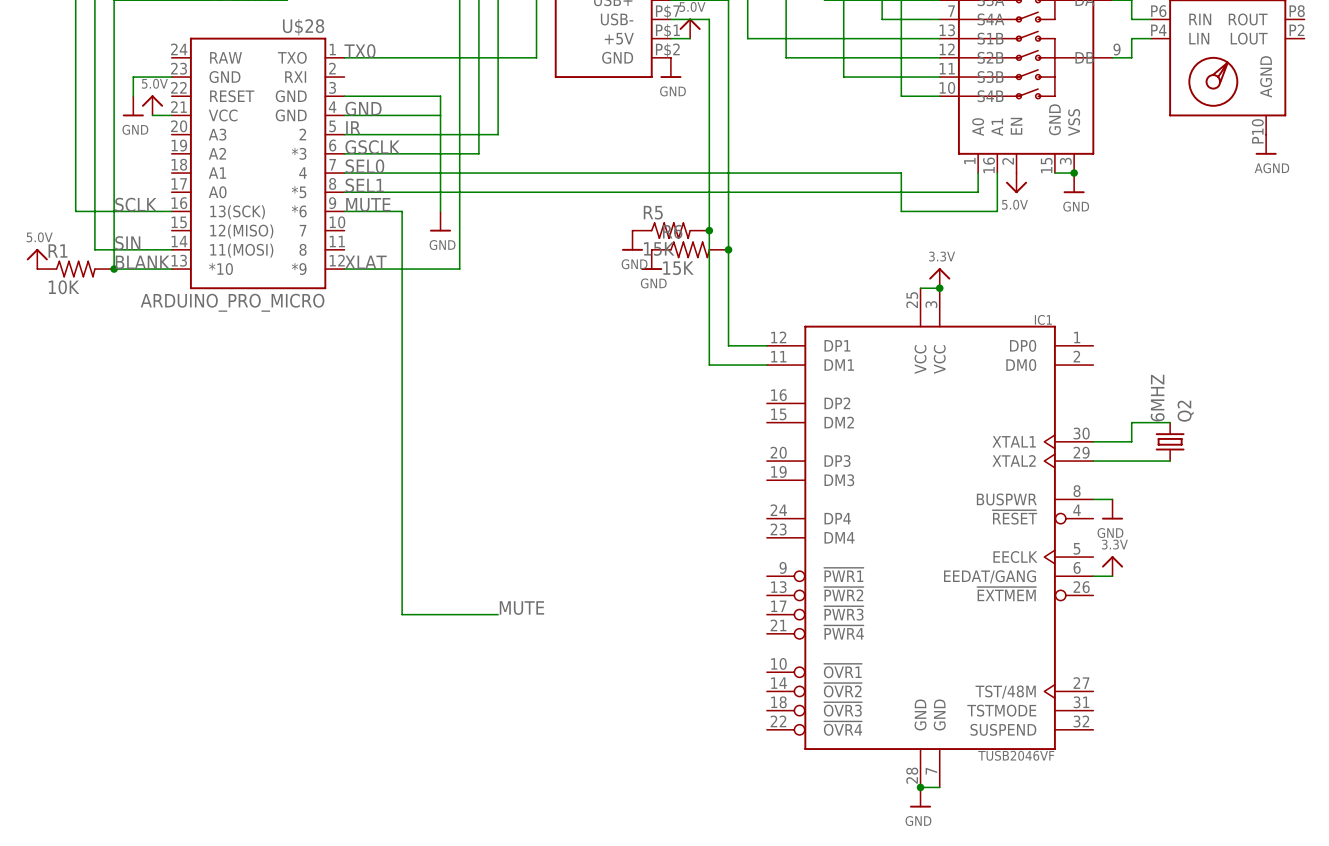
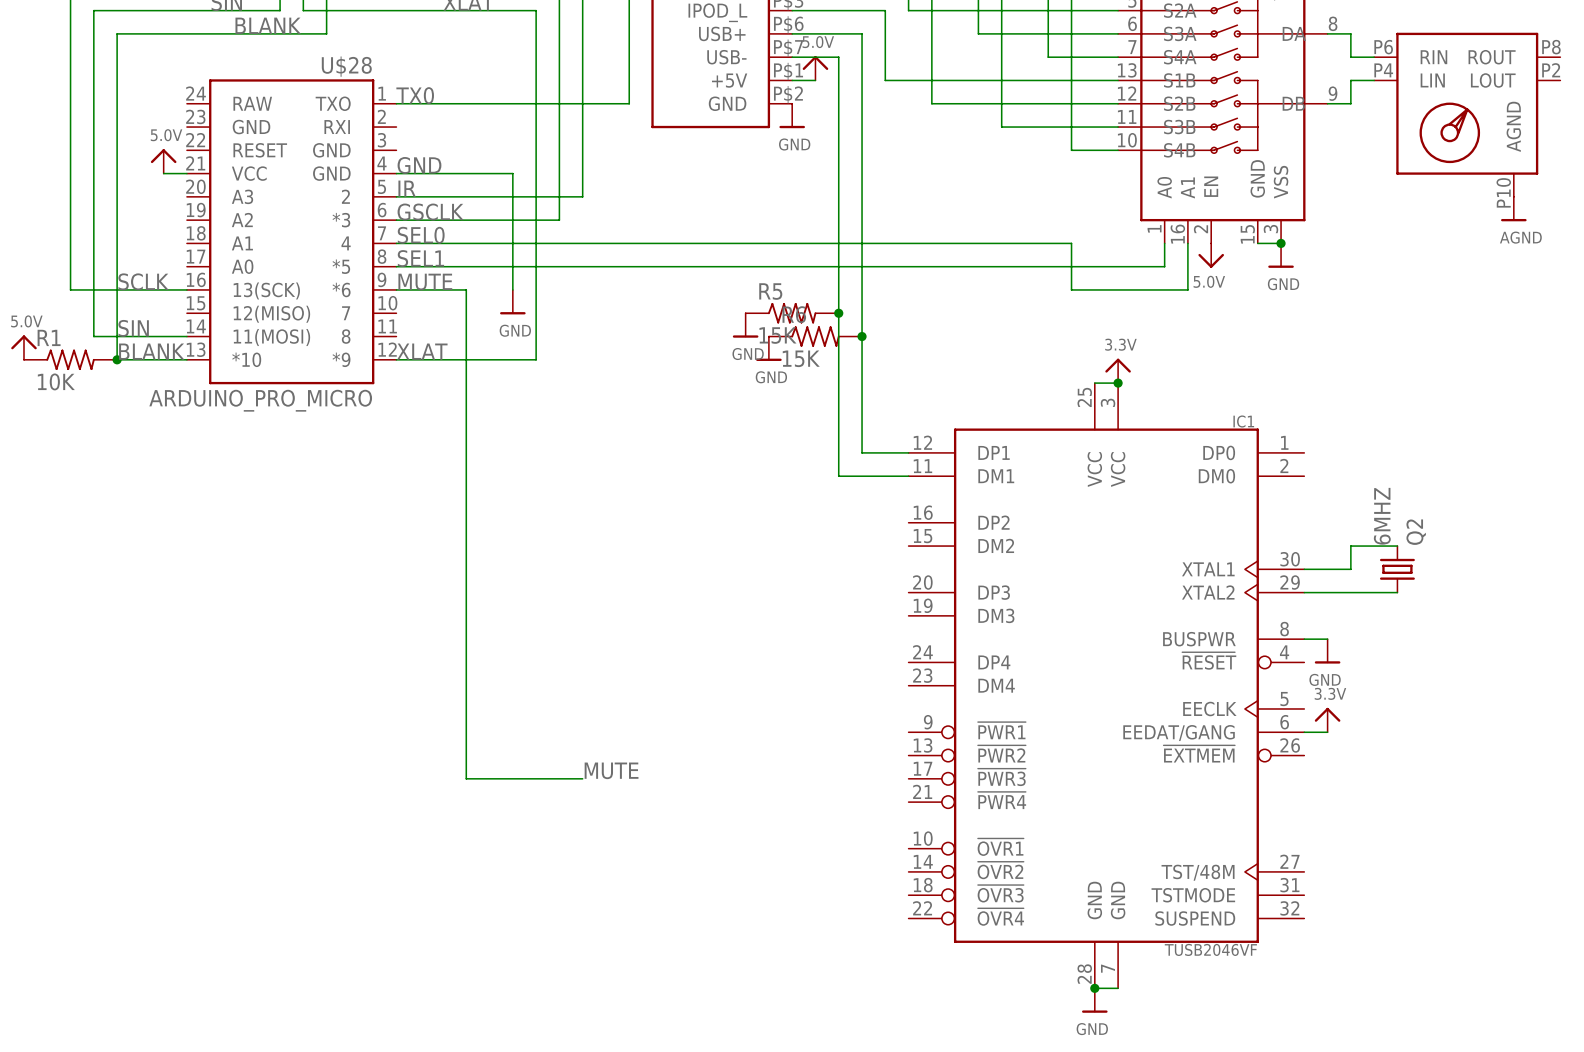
wire: (171, 77) (133, 77) (133, 96) -> none
wire: (344, 96) (440, 96) (440, 115) -> none
power symbol: GND (133, 106) -> none

